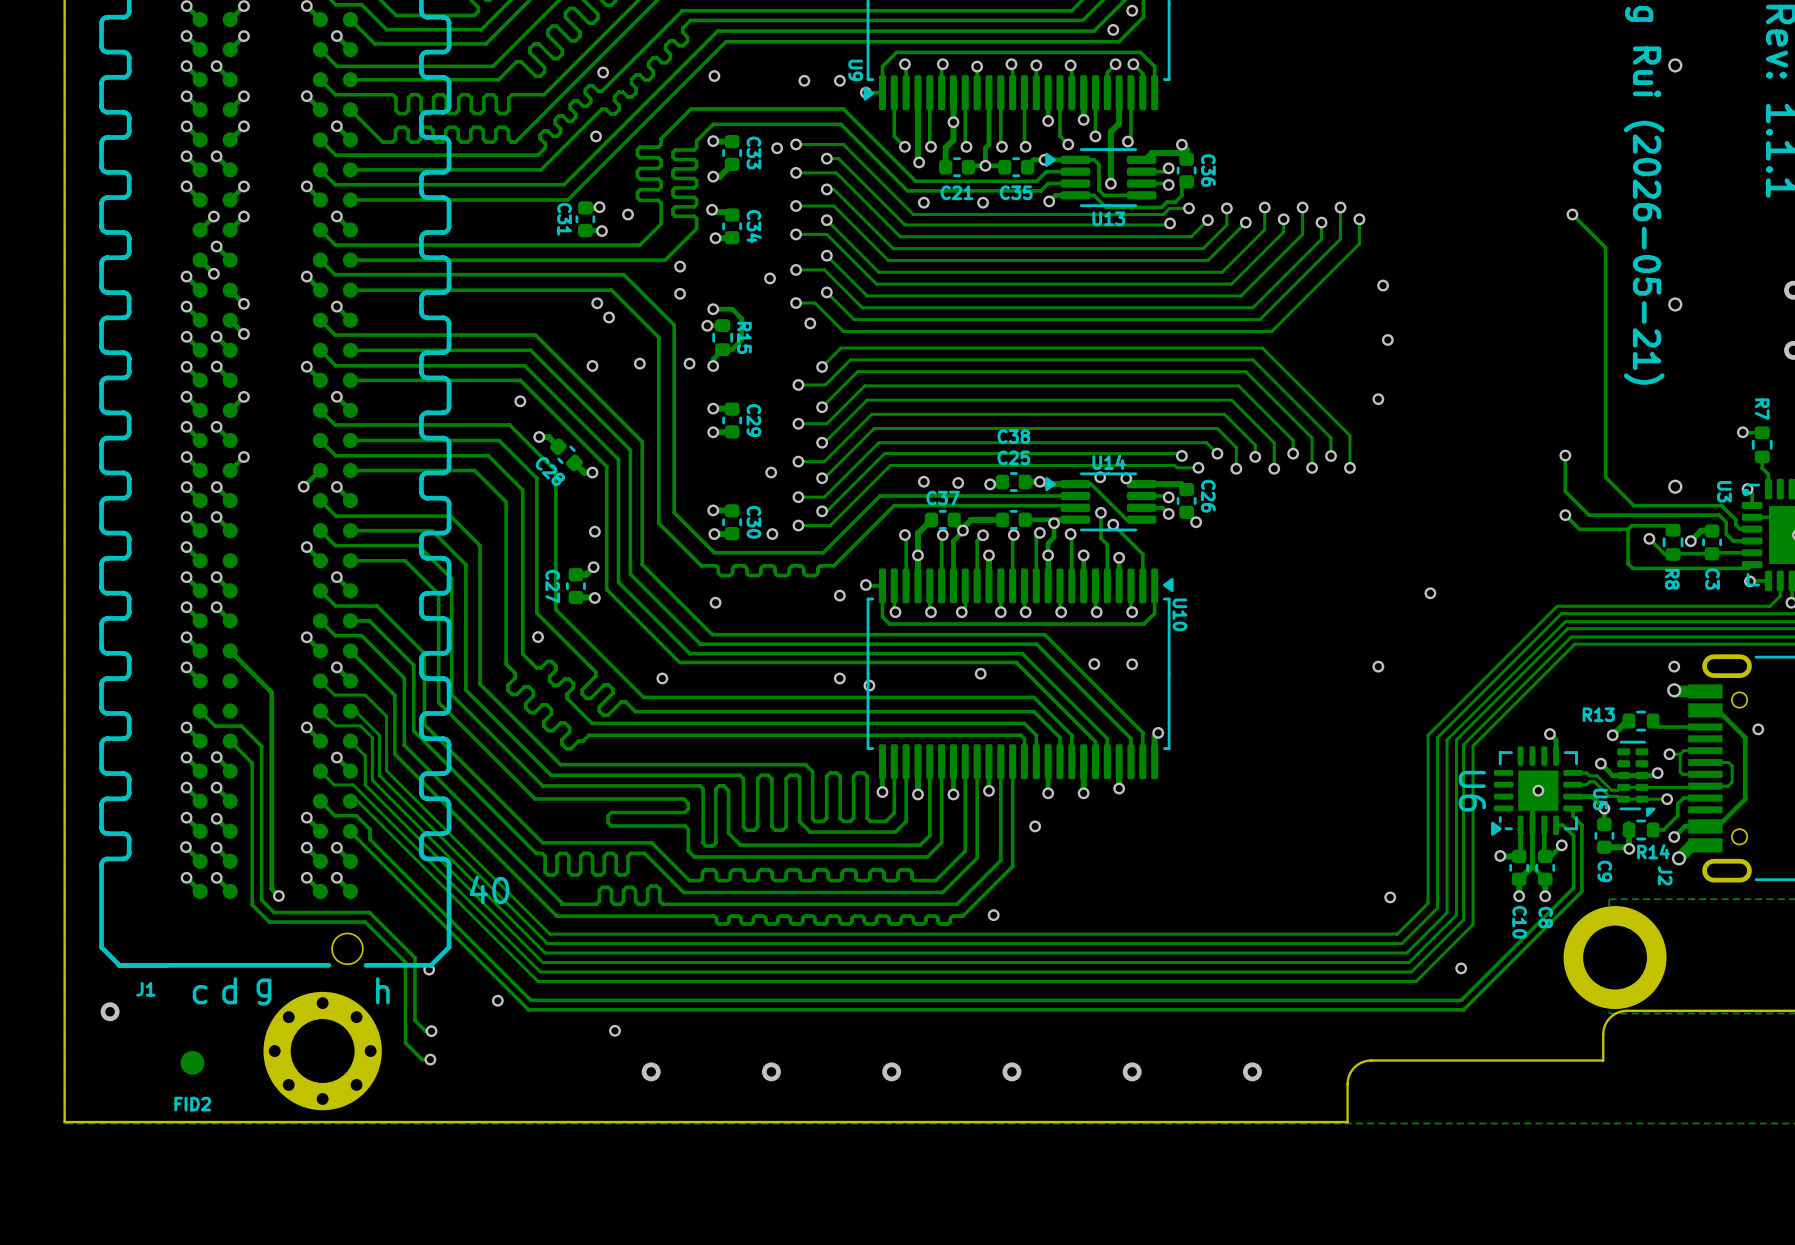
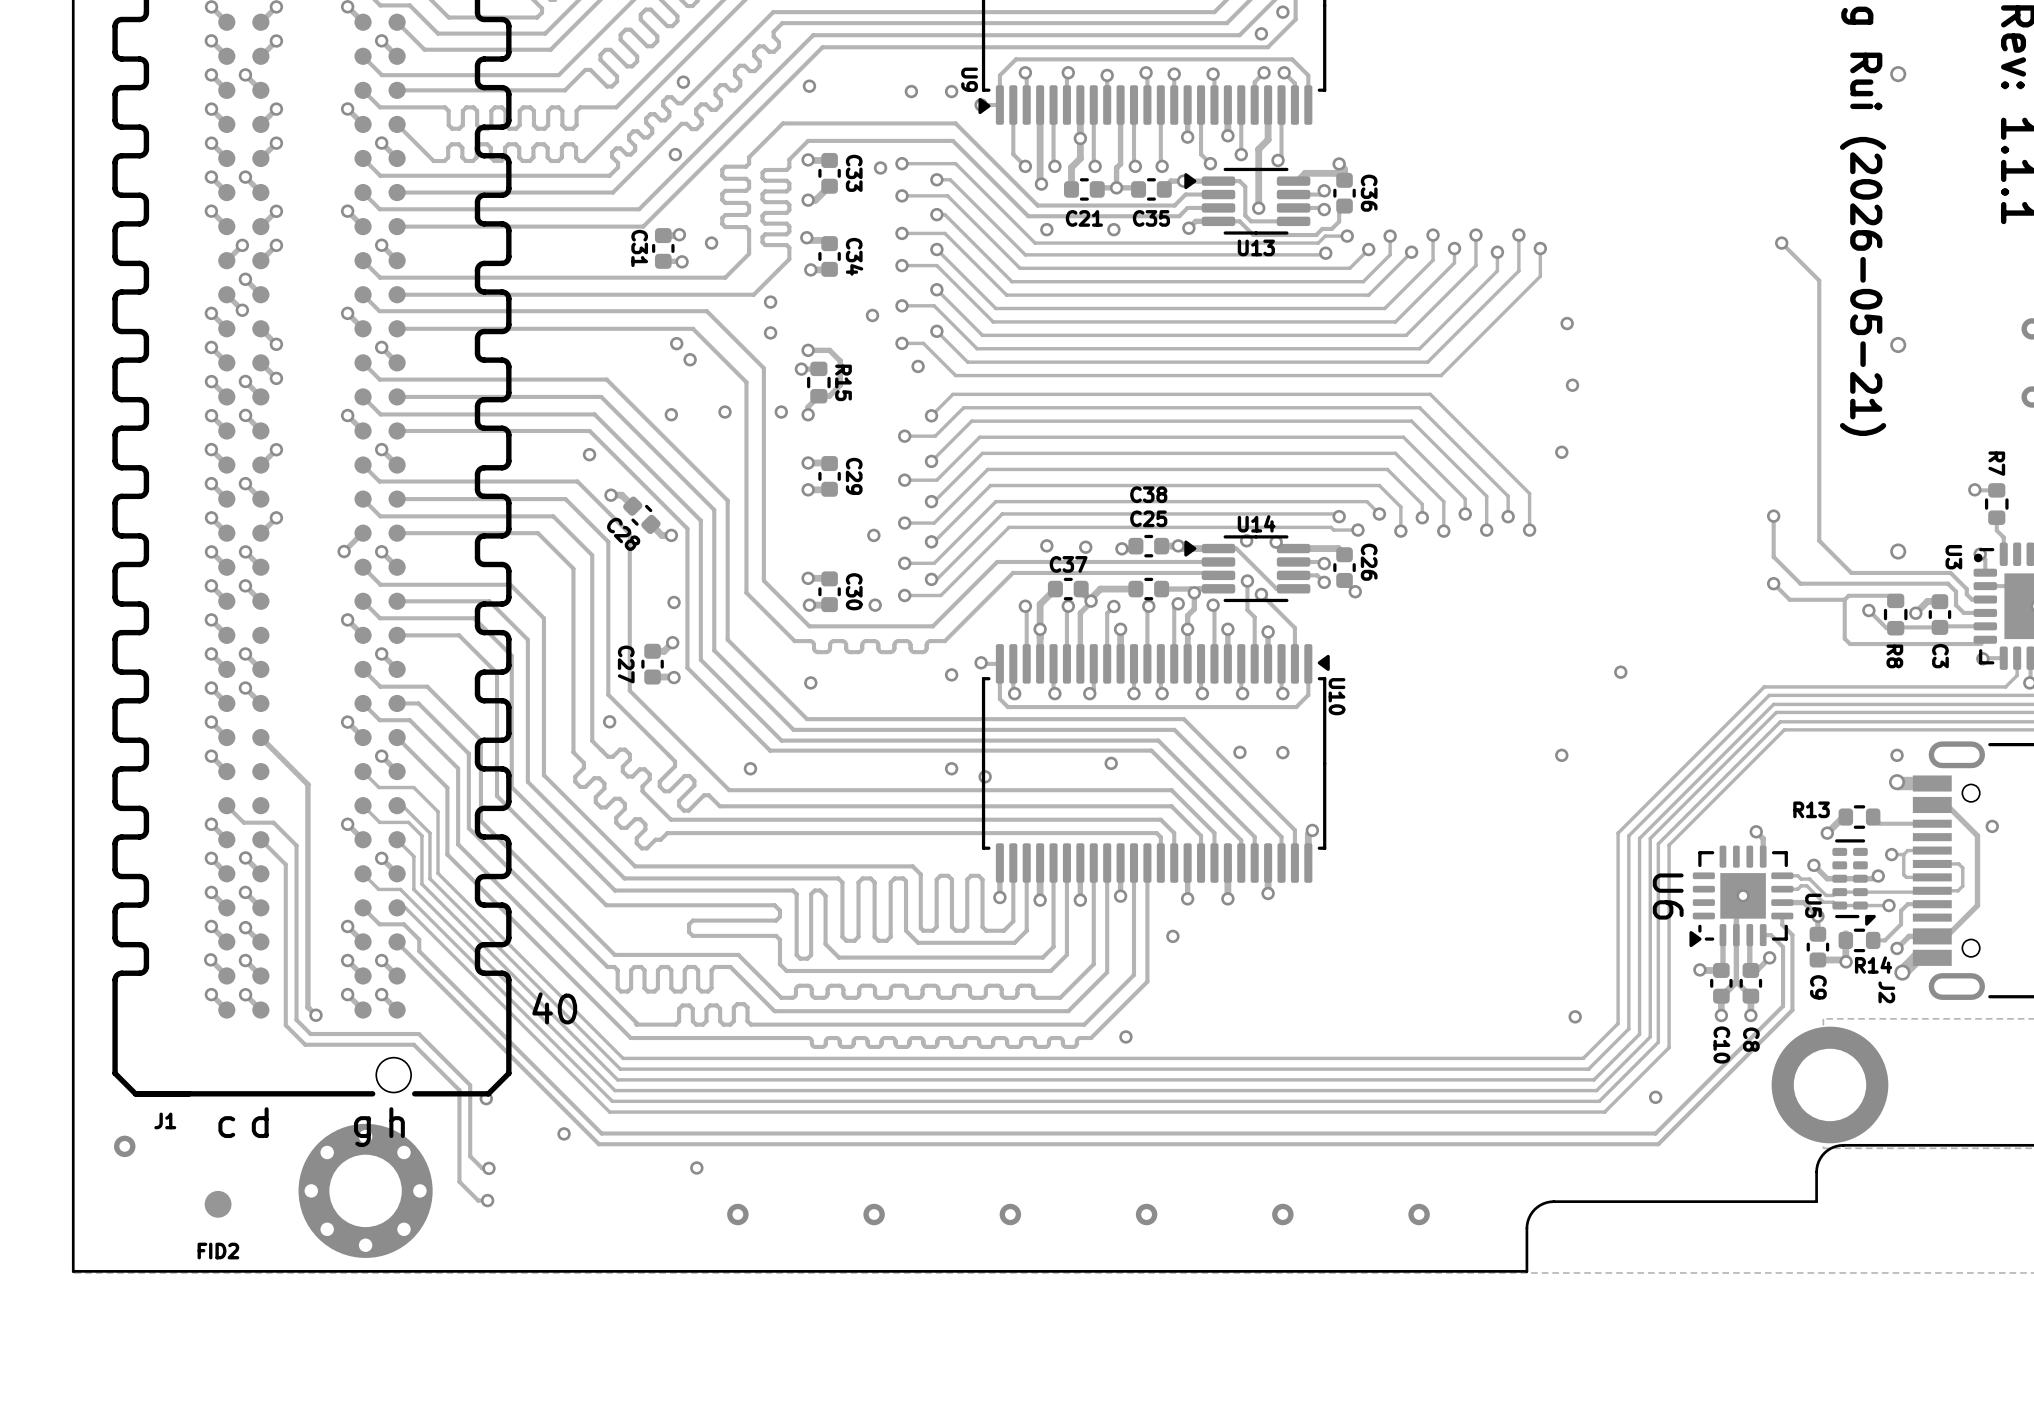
J1 text position: h (382, 990) -> h (397, 1122)
J1 text position: g (263, 992) -> g (362, 1131)

